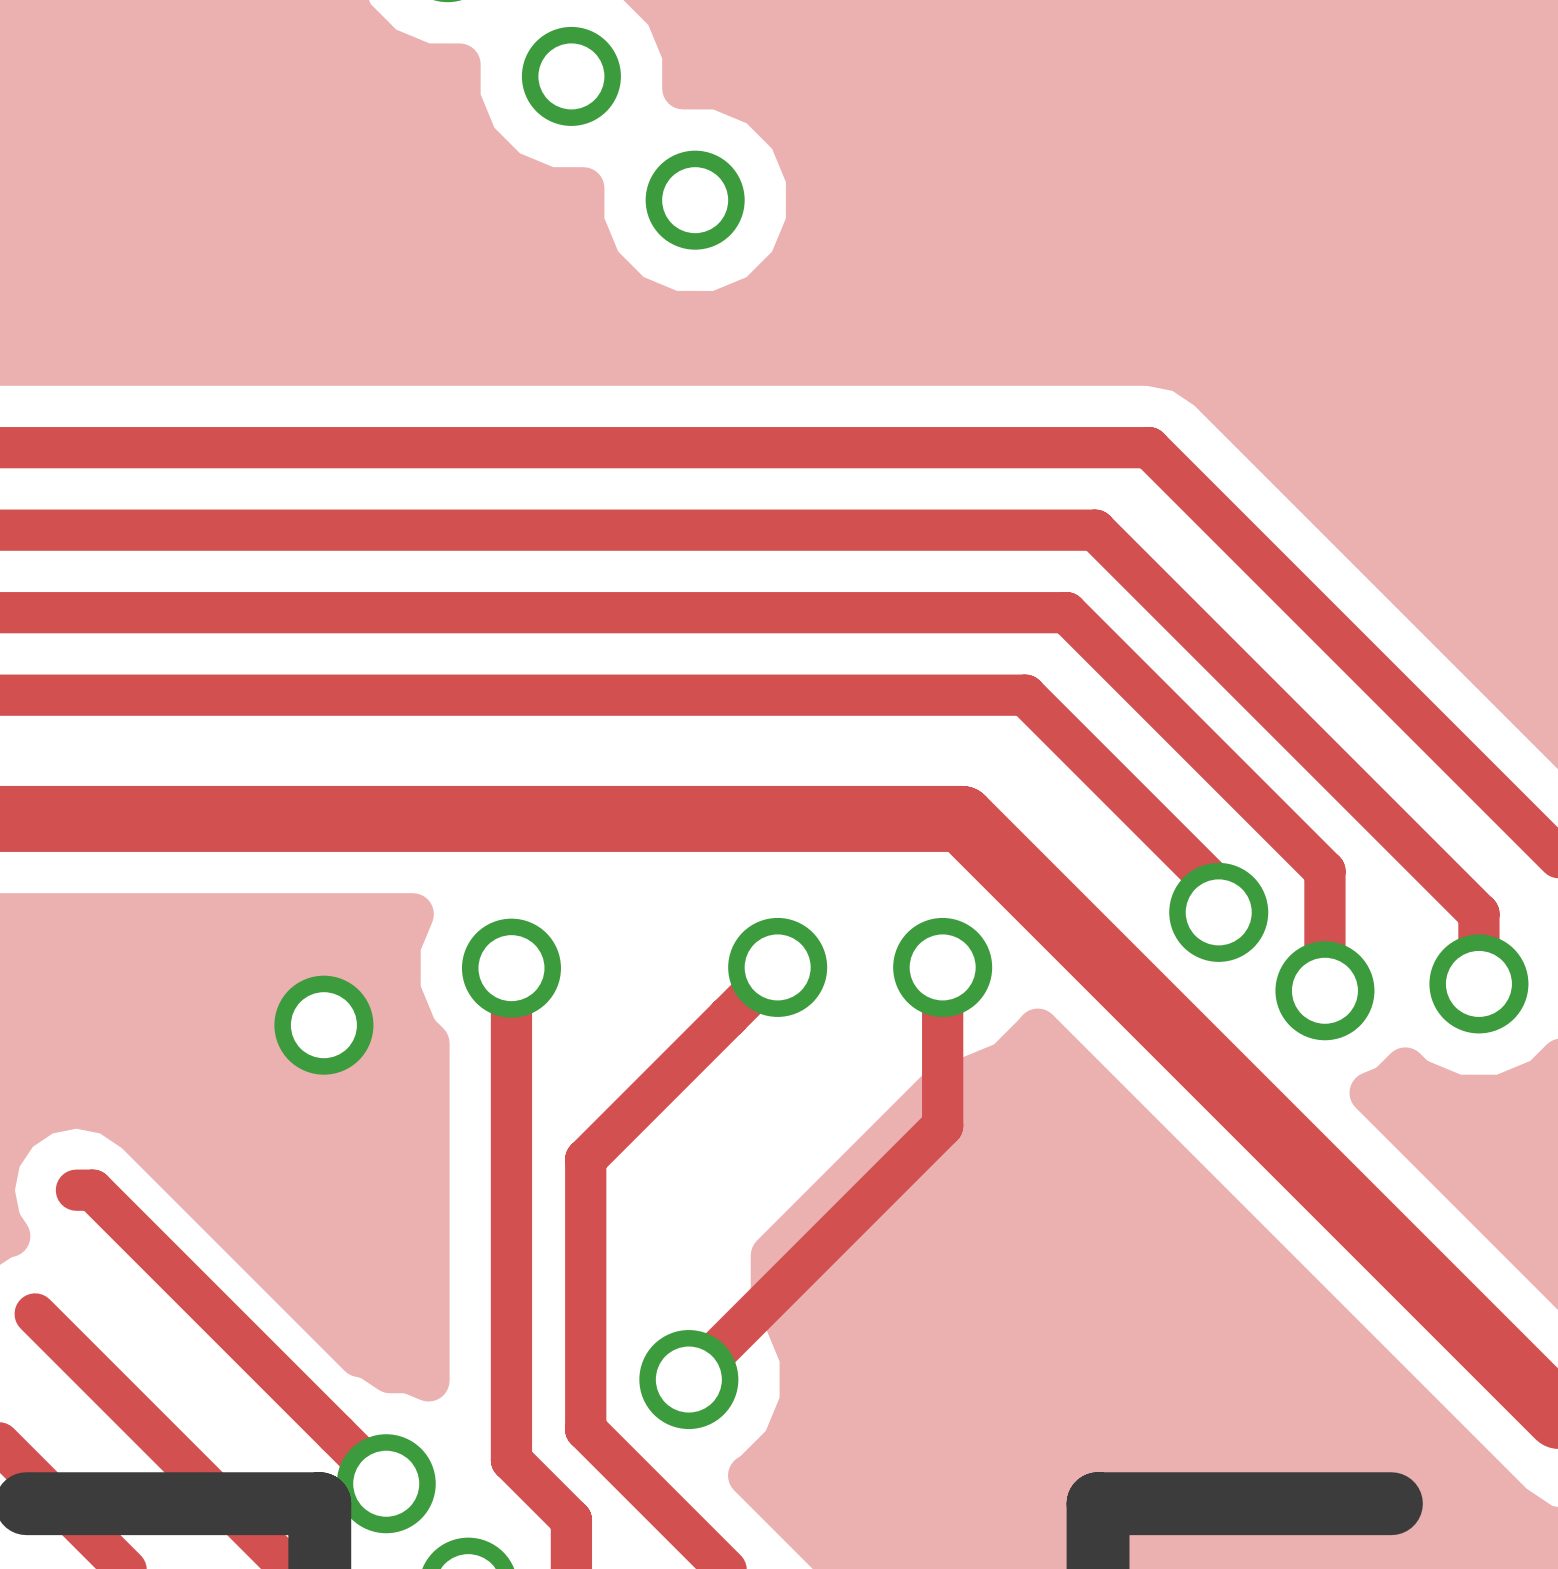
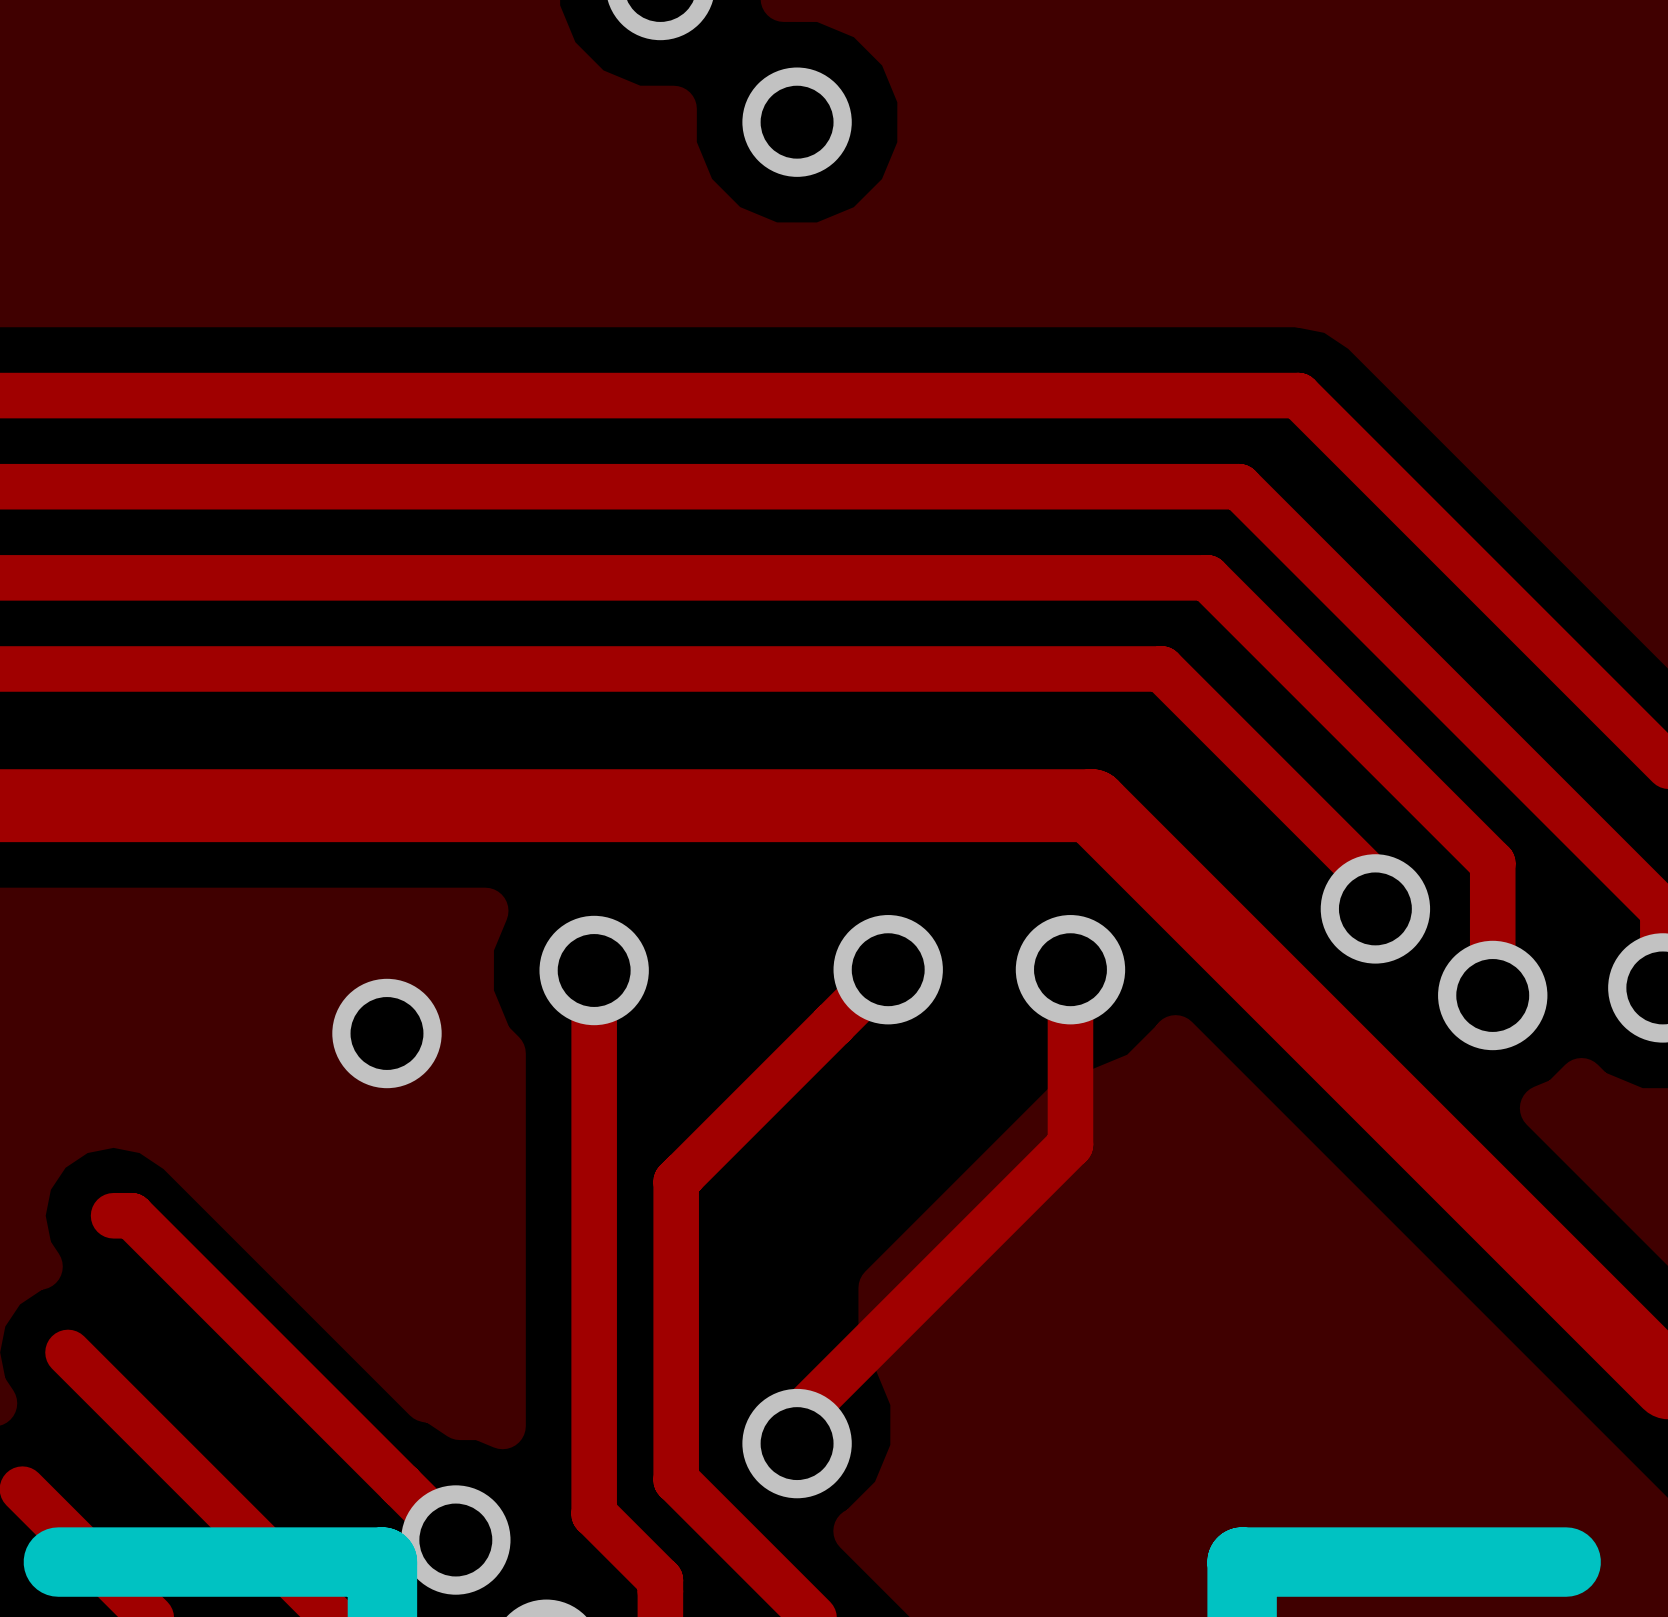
via position: (688, 1379) -> (797, 1443)

